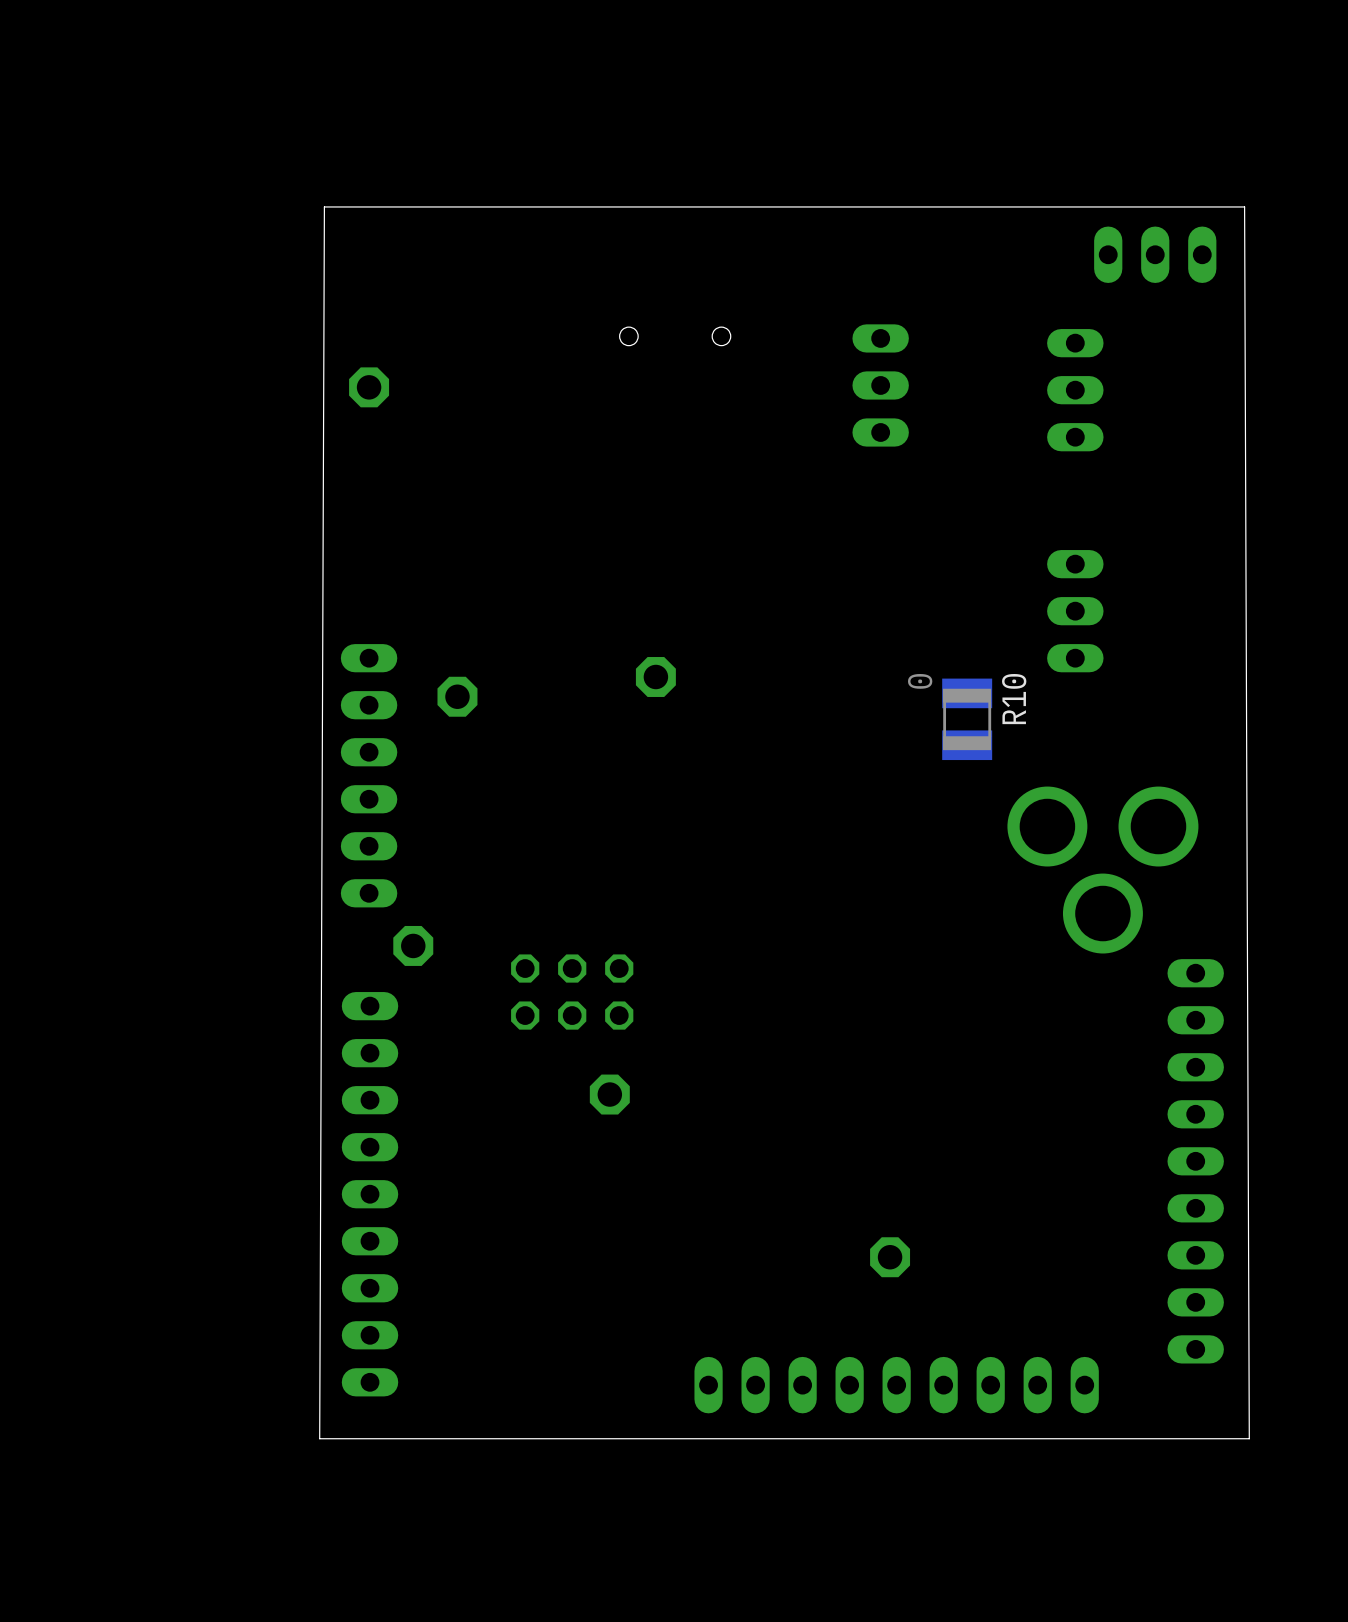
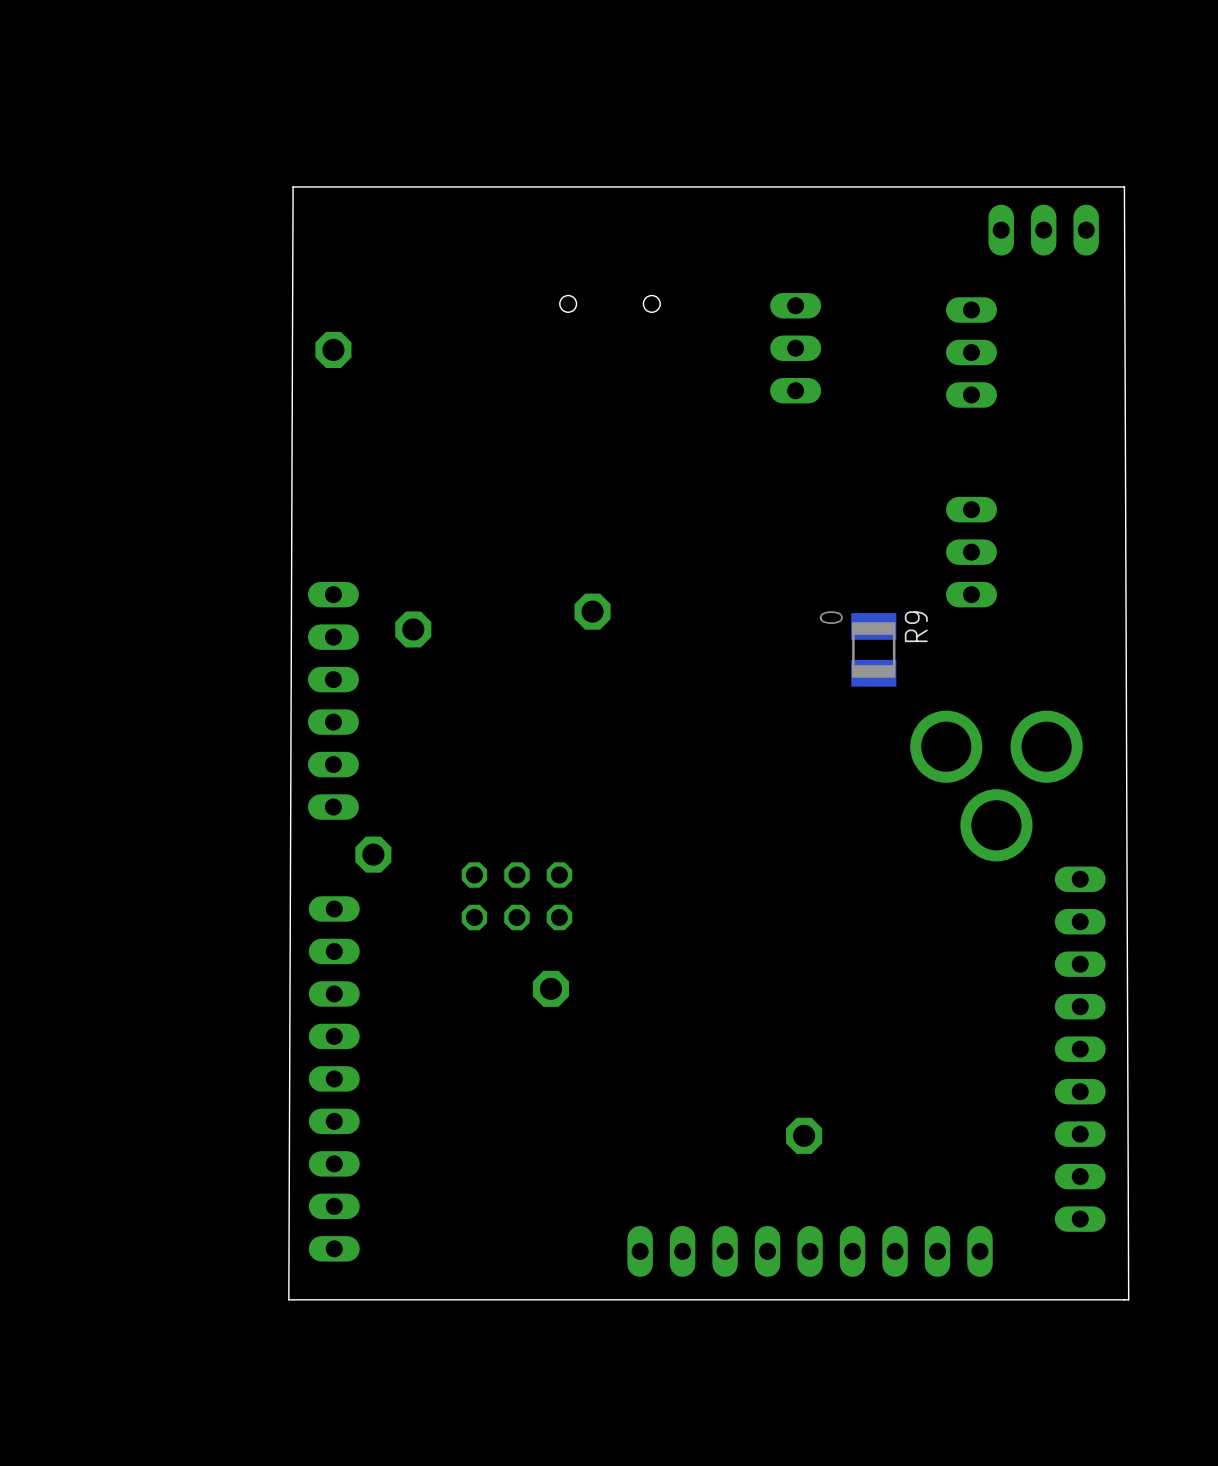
R10 name: R10 (1014, 699) -> R9 (916, 626)

